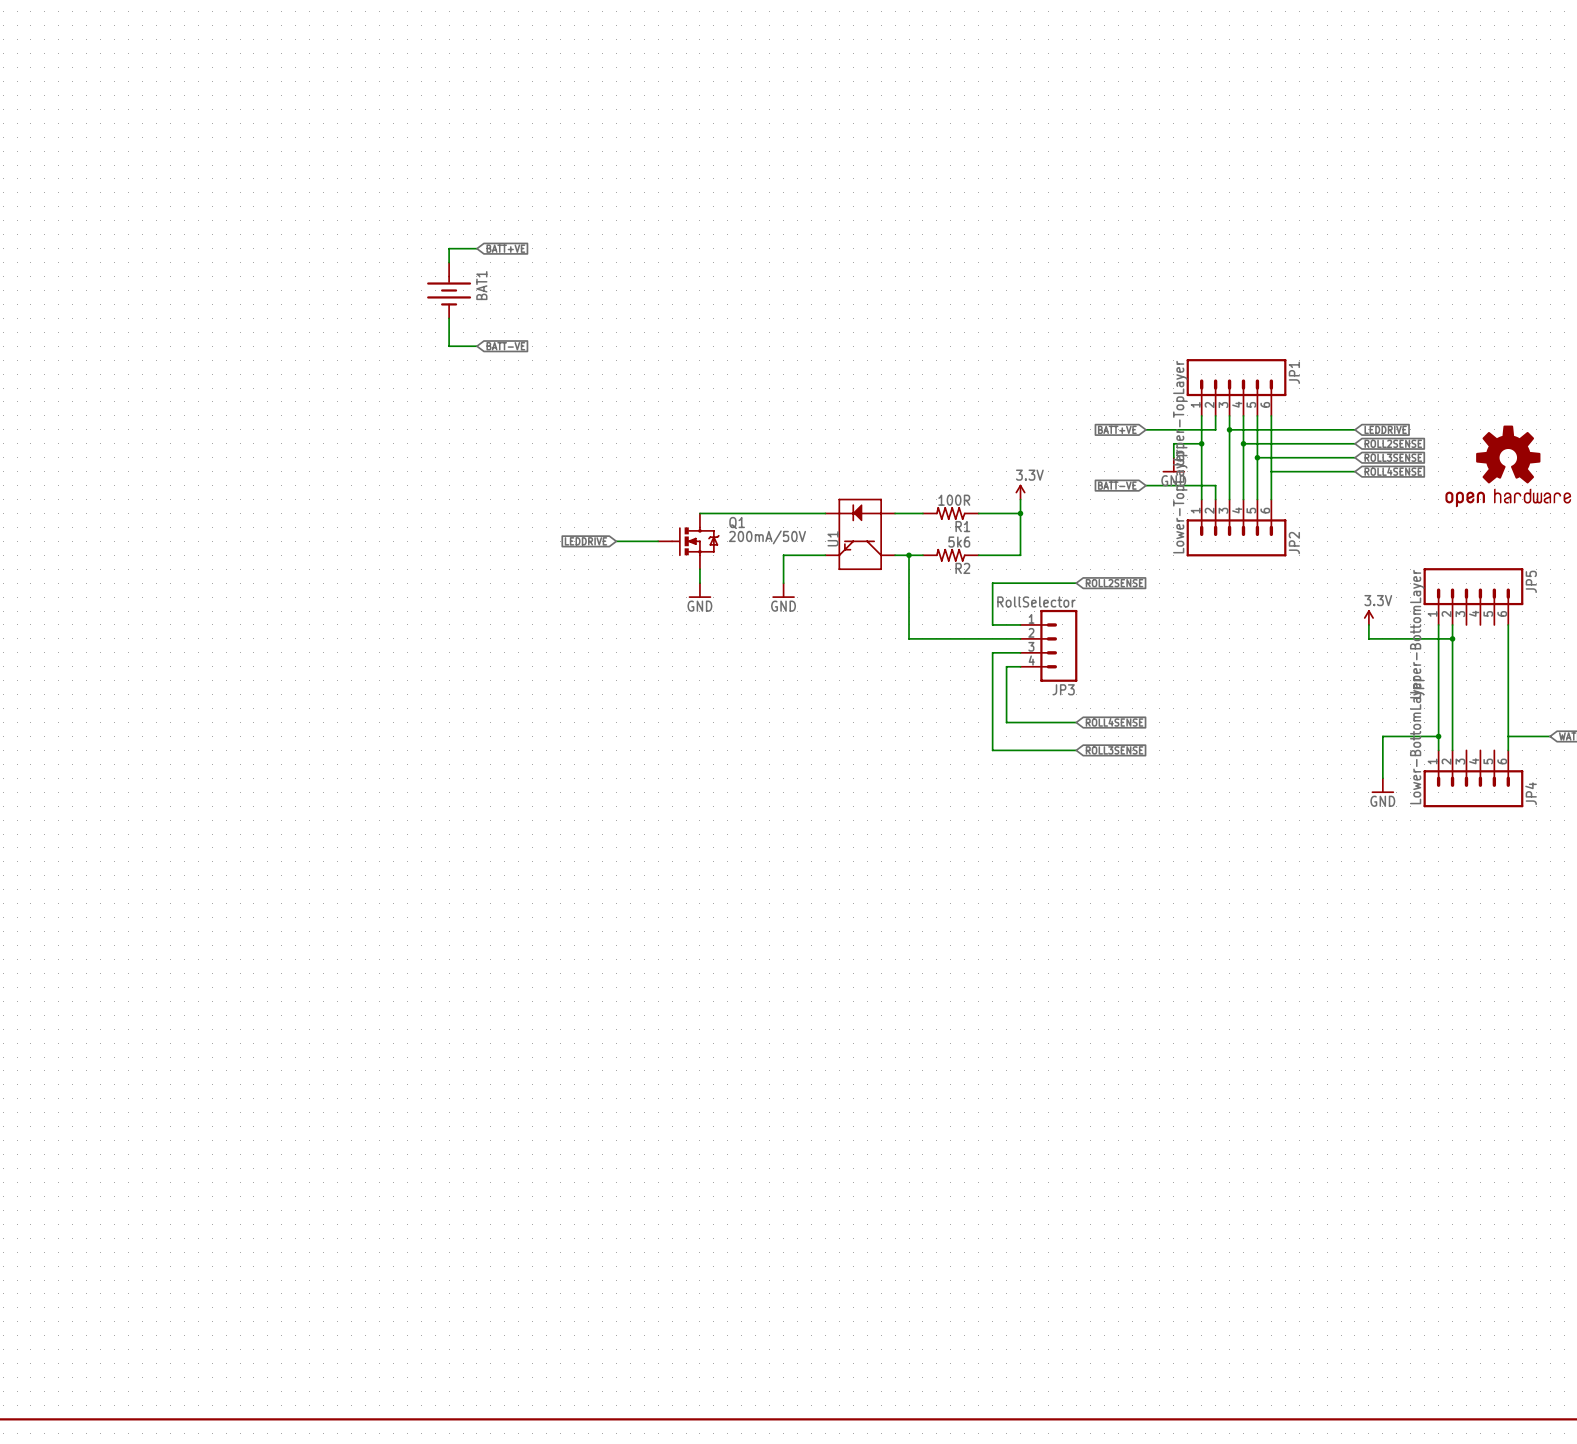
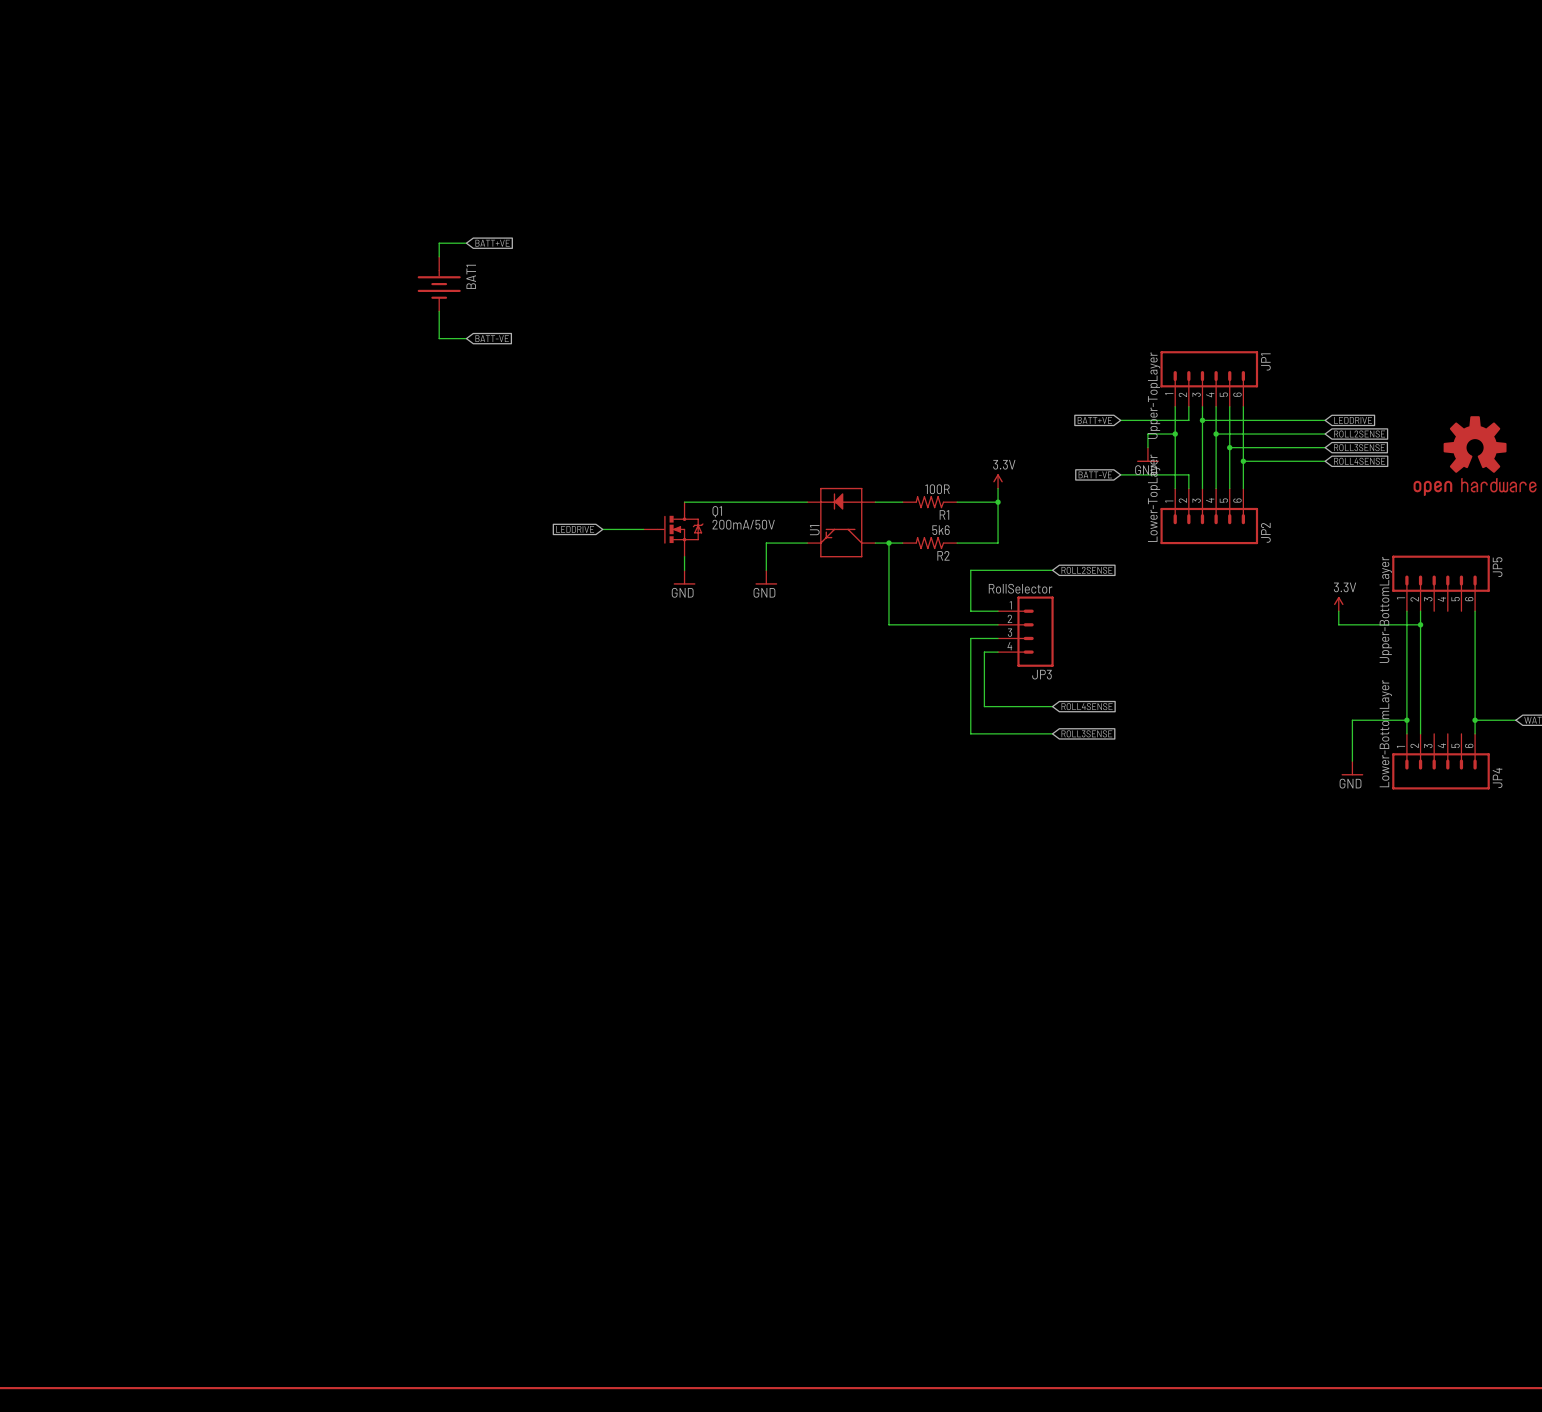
junction: none -> (1243, 461)
junction: none -> (1475, 720)

